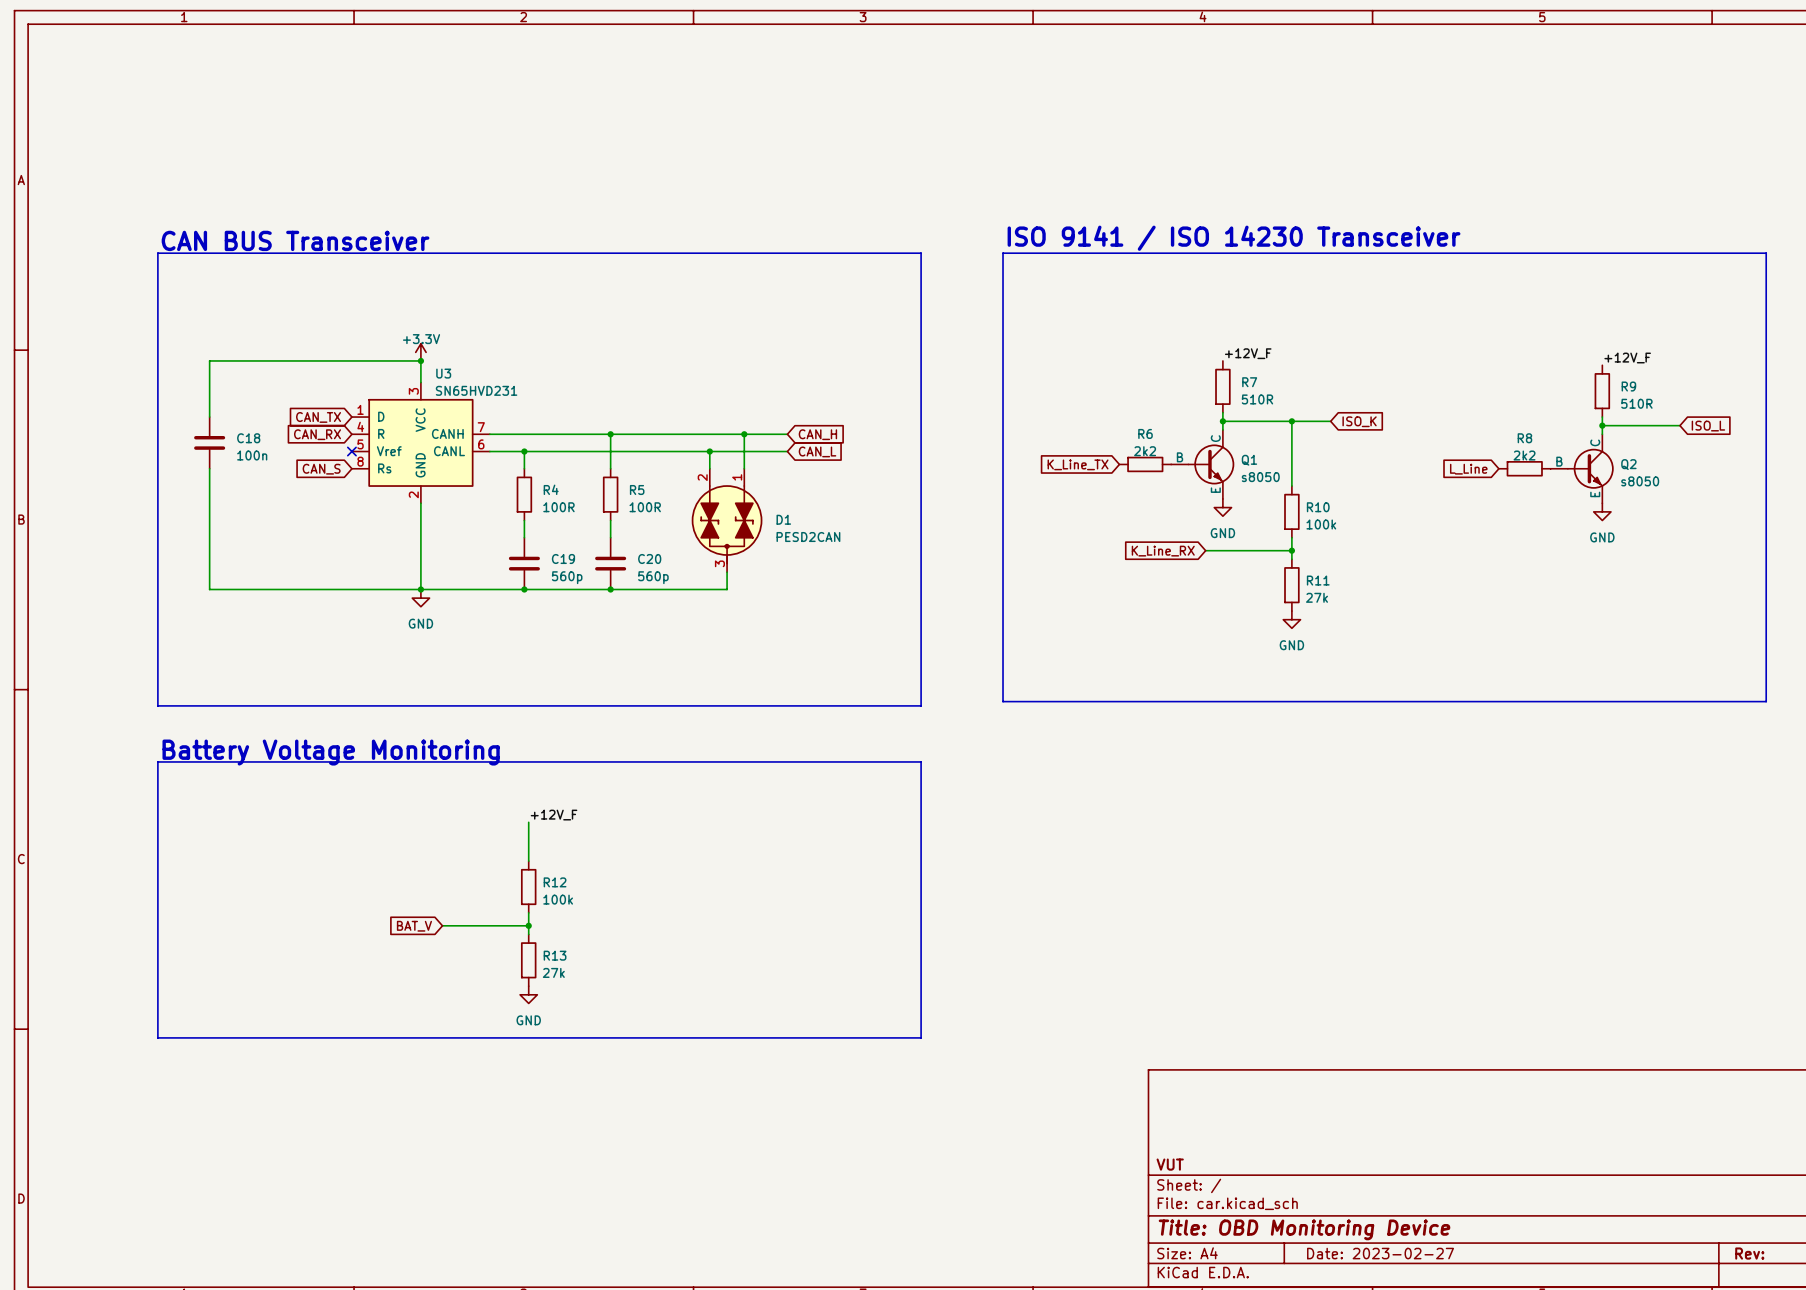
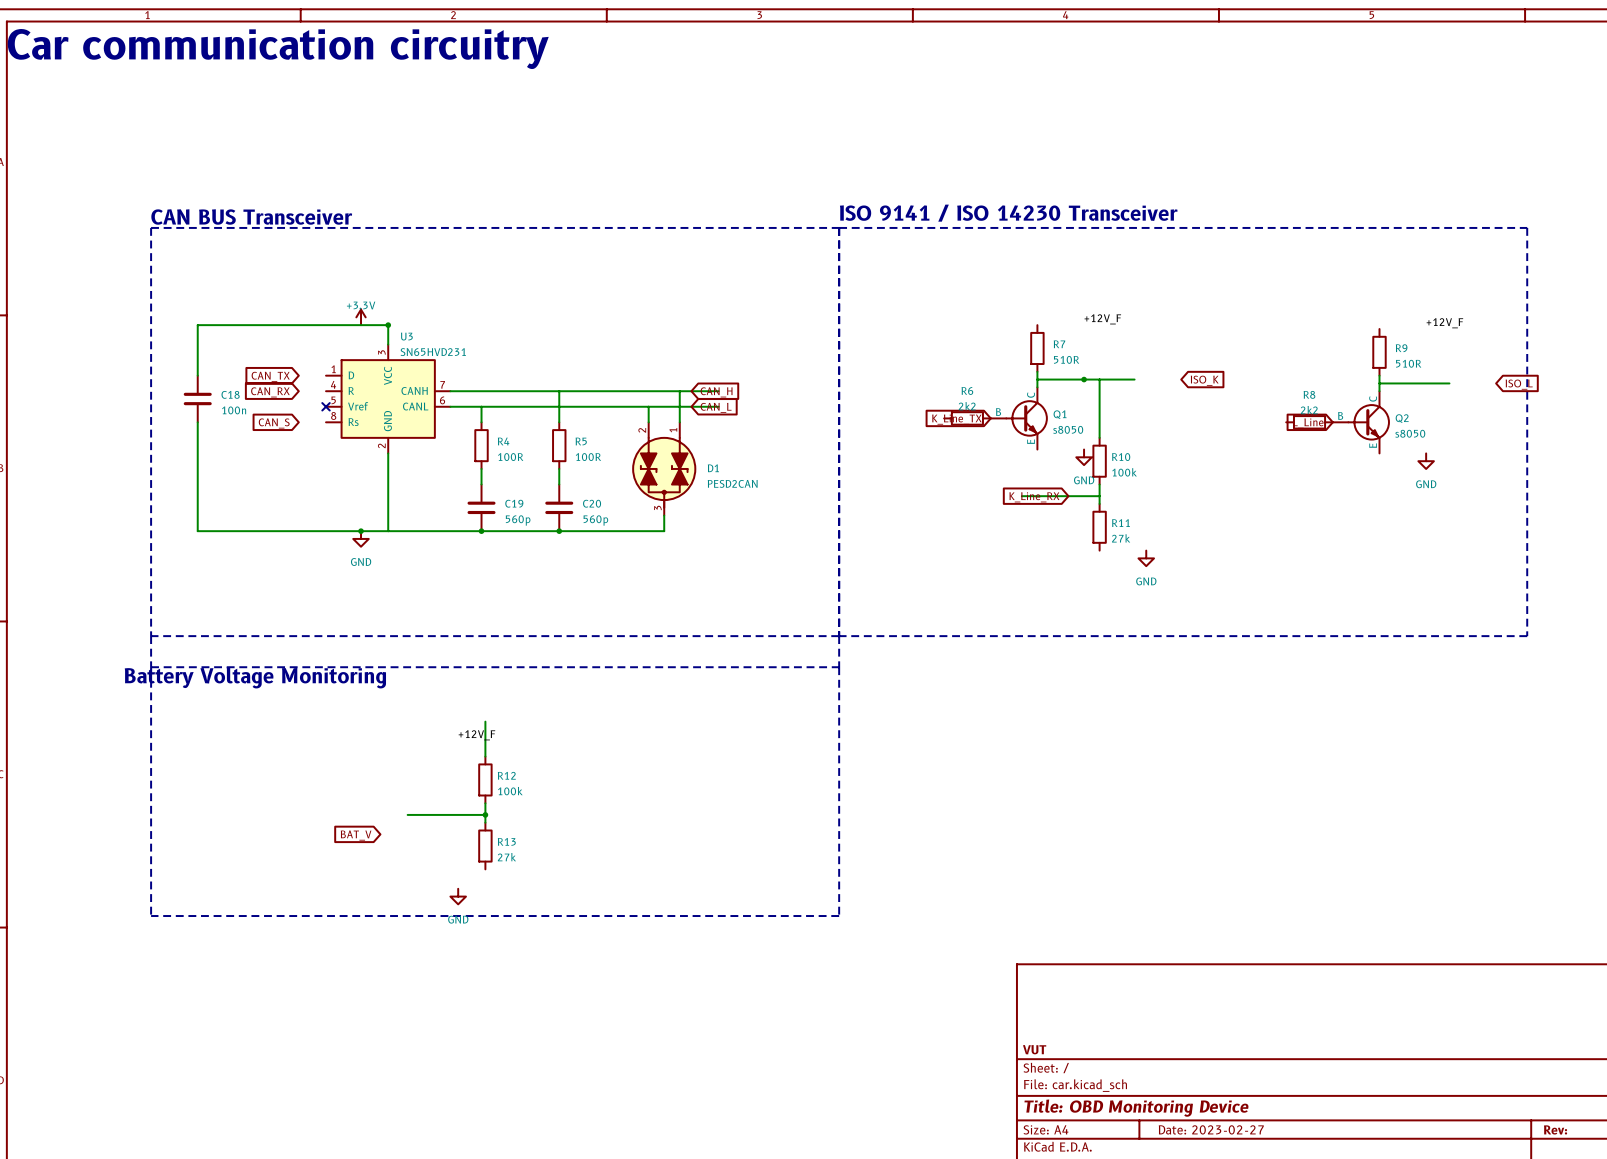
text: none -> Car communication circuitry (278, 49)
text position: ISO 9141 / ISO 14230 Transceiver (1234, 238) -> ISO 9141 / ISO 14230 Transceiver (1008, 213)
text position: CAN BUS Transceiver (295, 240) -> CAN BUS Transceiver (251, 217)
line: (157, 253) (157, 705) (921, 705) (921, 253) (157, 253) -> none
line: none -> (839, 227) (839, 916) (151, 916) (151, 227) (1527, 227) (1527, 636) (151, 636)
line: (1003, 253) (1766, 253) (1766, 701) (1003, 701) (1003, 253) -> none
wire: (239, 360) (209, 360) (209, 417) -> (197, 325) (197, 375)
wire: (420, 360) (420, 382) -> (361, 325) (388, 325) (388, 344)
junction position: (420, 360) -> (388, 325)
R7 position: (1222, 386) -> (1037, 348)
R9 position: (1602, 391) -> (1379, 352)
wire: (1222, 412) (1222, 429) -> (1037, 371) (1037, 387)
wire: (1602, 417) (1602, 434) -> (1379, 375) (1379, 391)
wire: (1278, 421) (1330, 421) -> (1037, 379) (1084, 379)
wire: (1291, 421) (1291, 486) -> (1099, 379) (1099, 437)
junction: (1291, 421) -> none
junction: (1602, 425) -> none
wire: (1628, 425) (1679, 425) -> (1379, 383) (1426, 383)
wire: (610, 434) (610, 468) -> (559, 391) (559, 422)
junction: (610, 434) -> none
wire: (744, 434) (744, 468) -> (679, 391) (679, 422)
junction: (744, 434) -> none
wire: none -> (691, 391) (718, 391)
C18 position: (209, 442) -> (197, 398)
U3 position: (420, 442) -> (388, 398)
no-connect mark position: (351, 451) -> (326, 406)
wire: (524, 451) (524, 468) -> (481, 406) (481, 422)
junction: (524, 451) -> none
wire: (709, 451) (709, 468) -> (648, 406) (648, 422)
junction: (709, 451) -> none
wire: none -> (691, 406) (718, 406)
R6 position: (1145, 464) -> (967, 418)
Q1 position: (1202, 464) -> (1019, 418)
wire: (209, 468) (209, 589) (239, 589) -> (197, 422) (197, 531)
R8 position: (1524, 468) -> (1309, 422)
Q2 position: (1582, 468) -> (1361, 422)
R4 position: (524, 494) -> (481, 445)
R5 position: (610, 494) -> (559, 445)
wire: (420, 503) (420, 589) -> (388, 453) (388, 531)
R10 position: (1291, 511) -> (1099, 461)
wire: (524, 520) (524, 537) -> (481, 468) (481, 484)
wire: (610, 520) (610, 537) -> (559, 468) (559, 484)
D1 position: (727, 520) -> (664, 468)
wire: (1291, 537) (1291, 559) -> (1099, 484) (1099, 503)
wire: (1240, 550) (1291, 550) -> (1021, 496) (1068, 496)
junction: (1291, 550) -> none
C19 position: (524, 563) -> (481, 507)
C20 position: (610, 563) -> (559, 507)
wire: (727, 572) (727, 589) -> (664, 515) (664, 531) (637, 531)
R11 position: (1291, 585) -> (1099, 527)
junction: (524, 589) -> none
junction: none -> (481, 531)
junction: (610, 589) -> none
junction: none -> (559, 531)
line: none -> (151, 667) (839, 667)
line: (157, 761) (921, 761) (921, 1037) (157, 1037) (157, 761) -> none
wire: (528, 822) (528, 861) -> (485, 721) (485, 756)
R12 position: (528, 887) -> (485, 779)
wire: (528, 912) (528, 934) -> (485, 803) (485, 822)
wire: (442, 925) (528, 925) -> (407, 814) (485, 814)
junction position: (528, 925) -> (485, 814)
R13 position: (528, 960) -> (485, 846)

